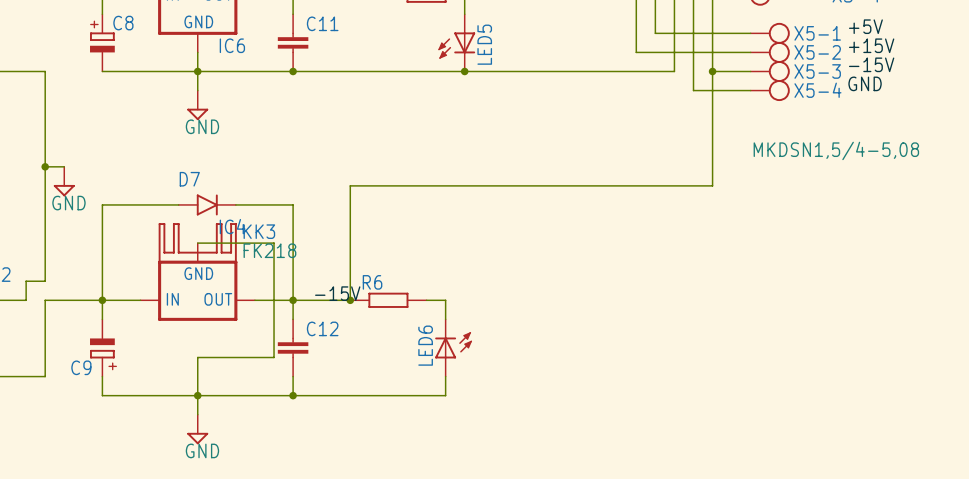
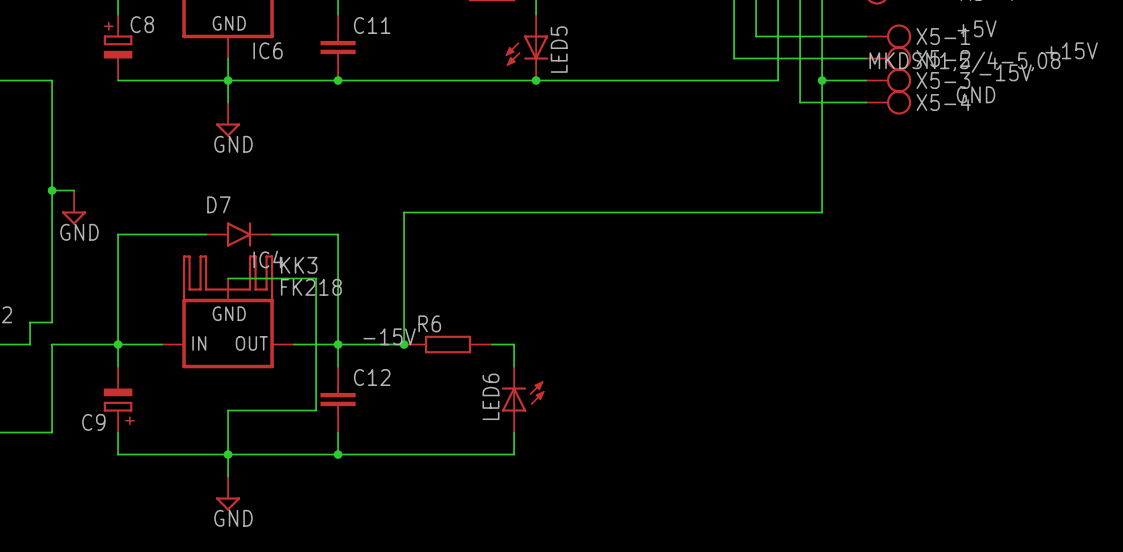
label position: +5V (865, 26) -> +5V (977, 28)
label position: +15V (871, 45) -> +15V (1071, 50)
label position: GND (865, 83) -> GND (976, 94)
X5-1 value position: MKDSN1,5/4-5,08 (836, 150) -> MKDSN1,5/4-5,08 (964, 62)

